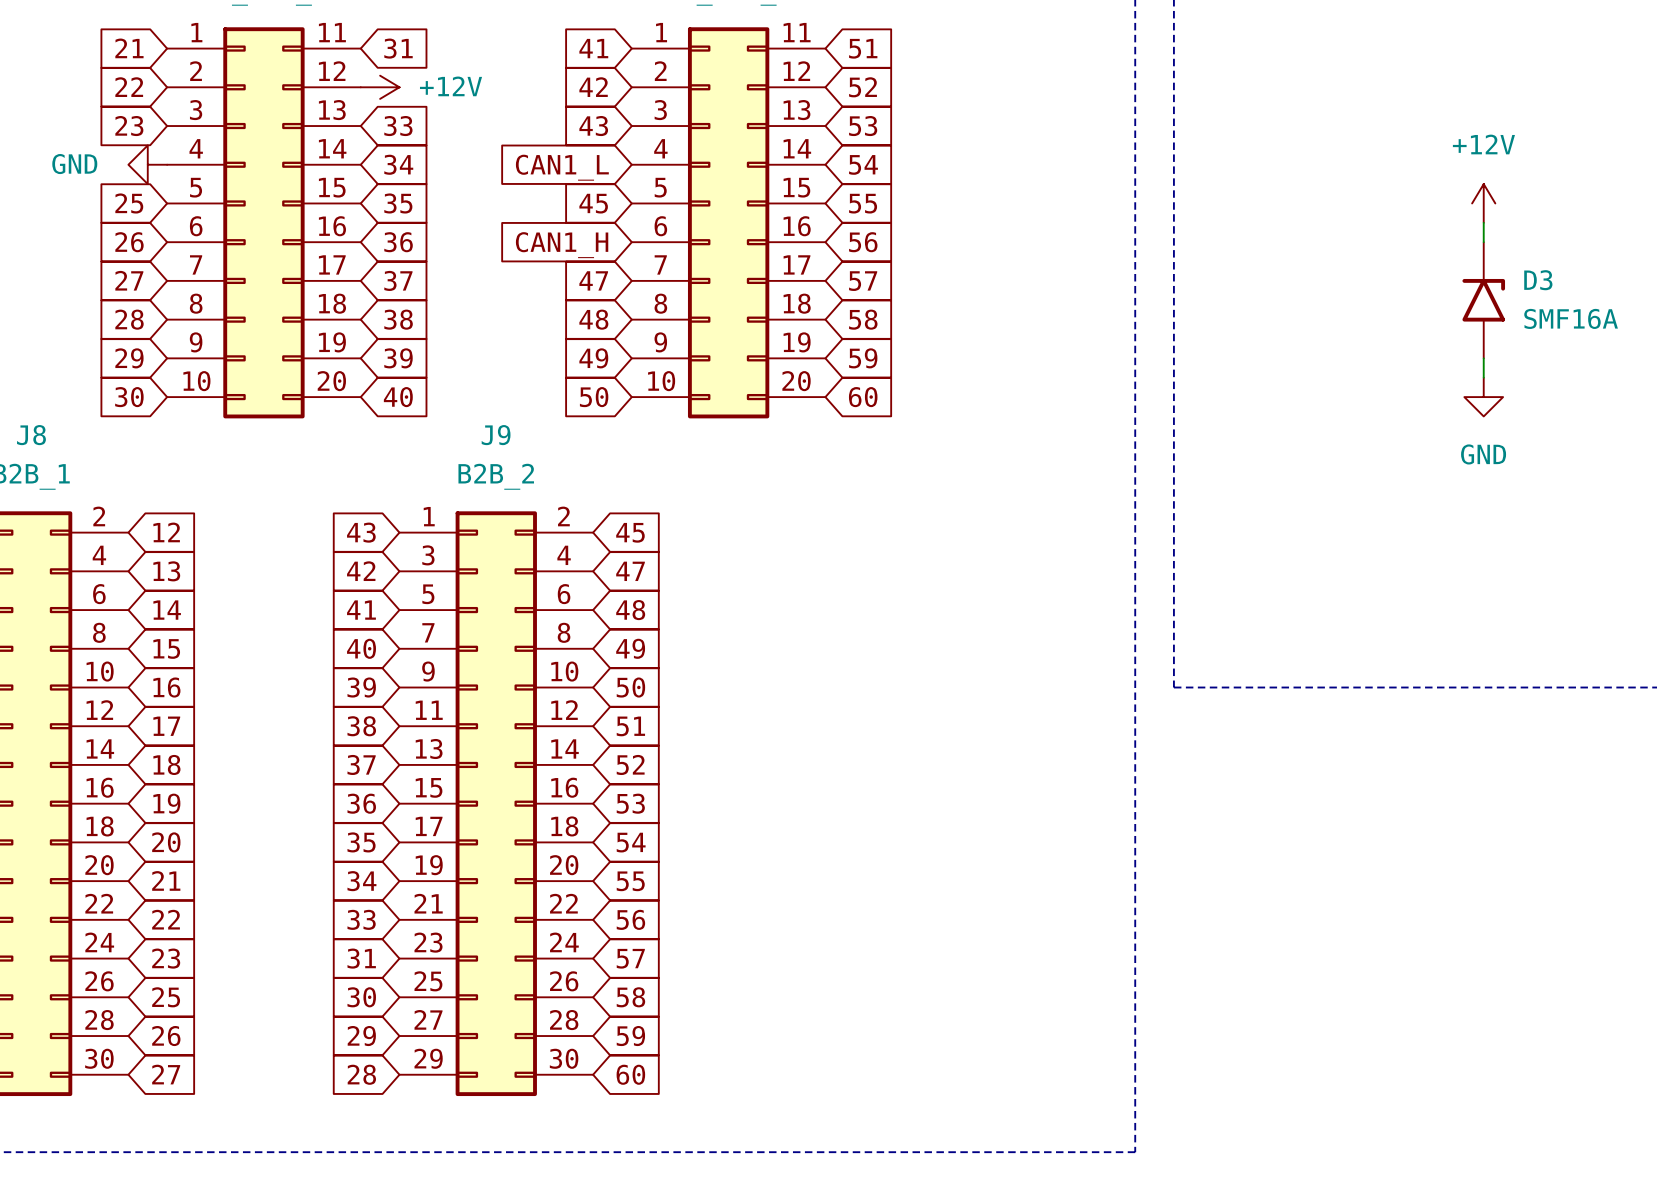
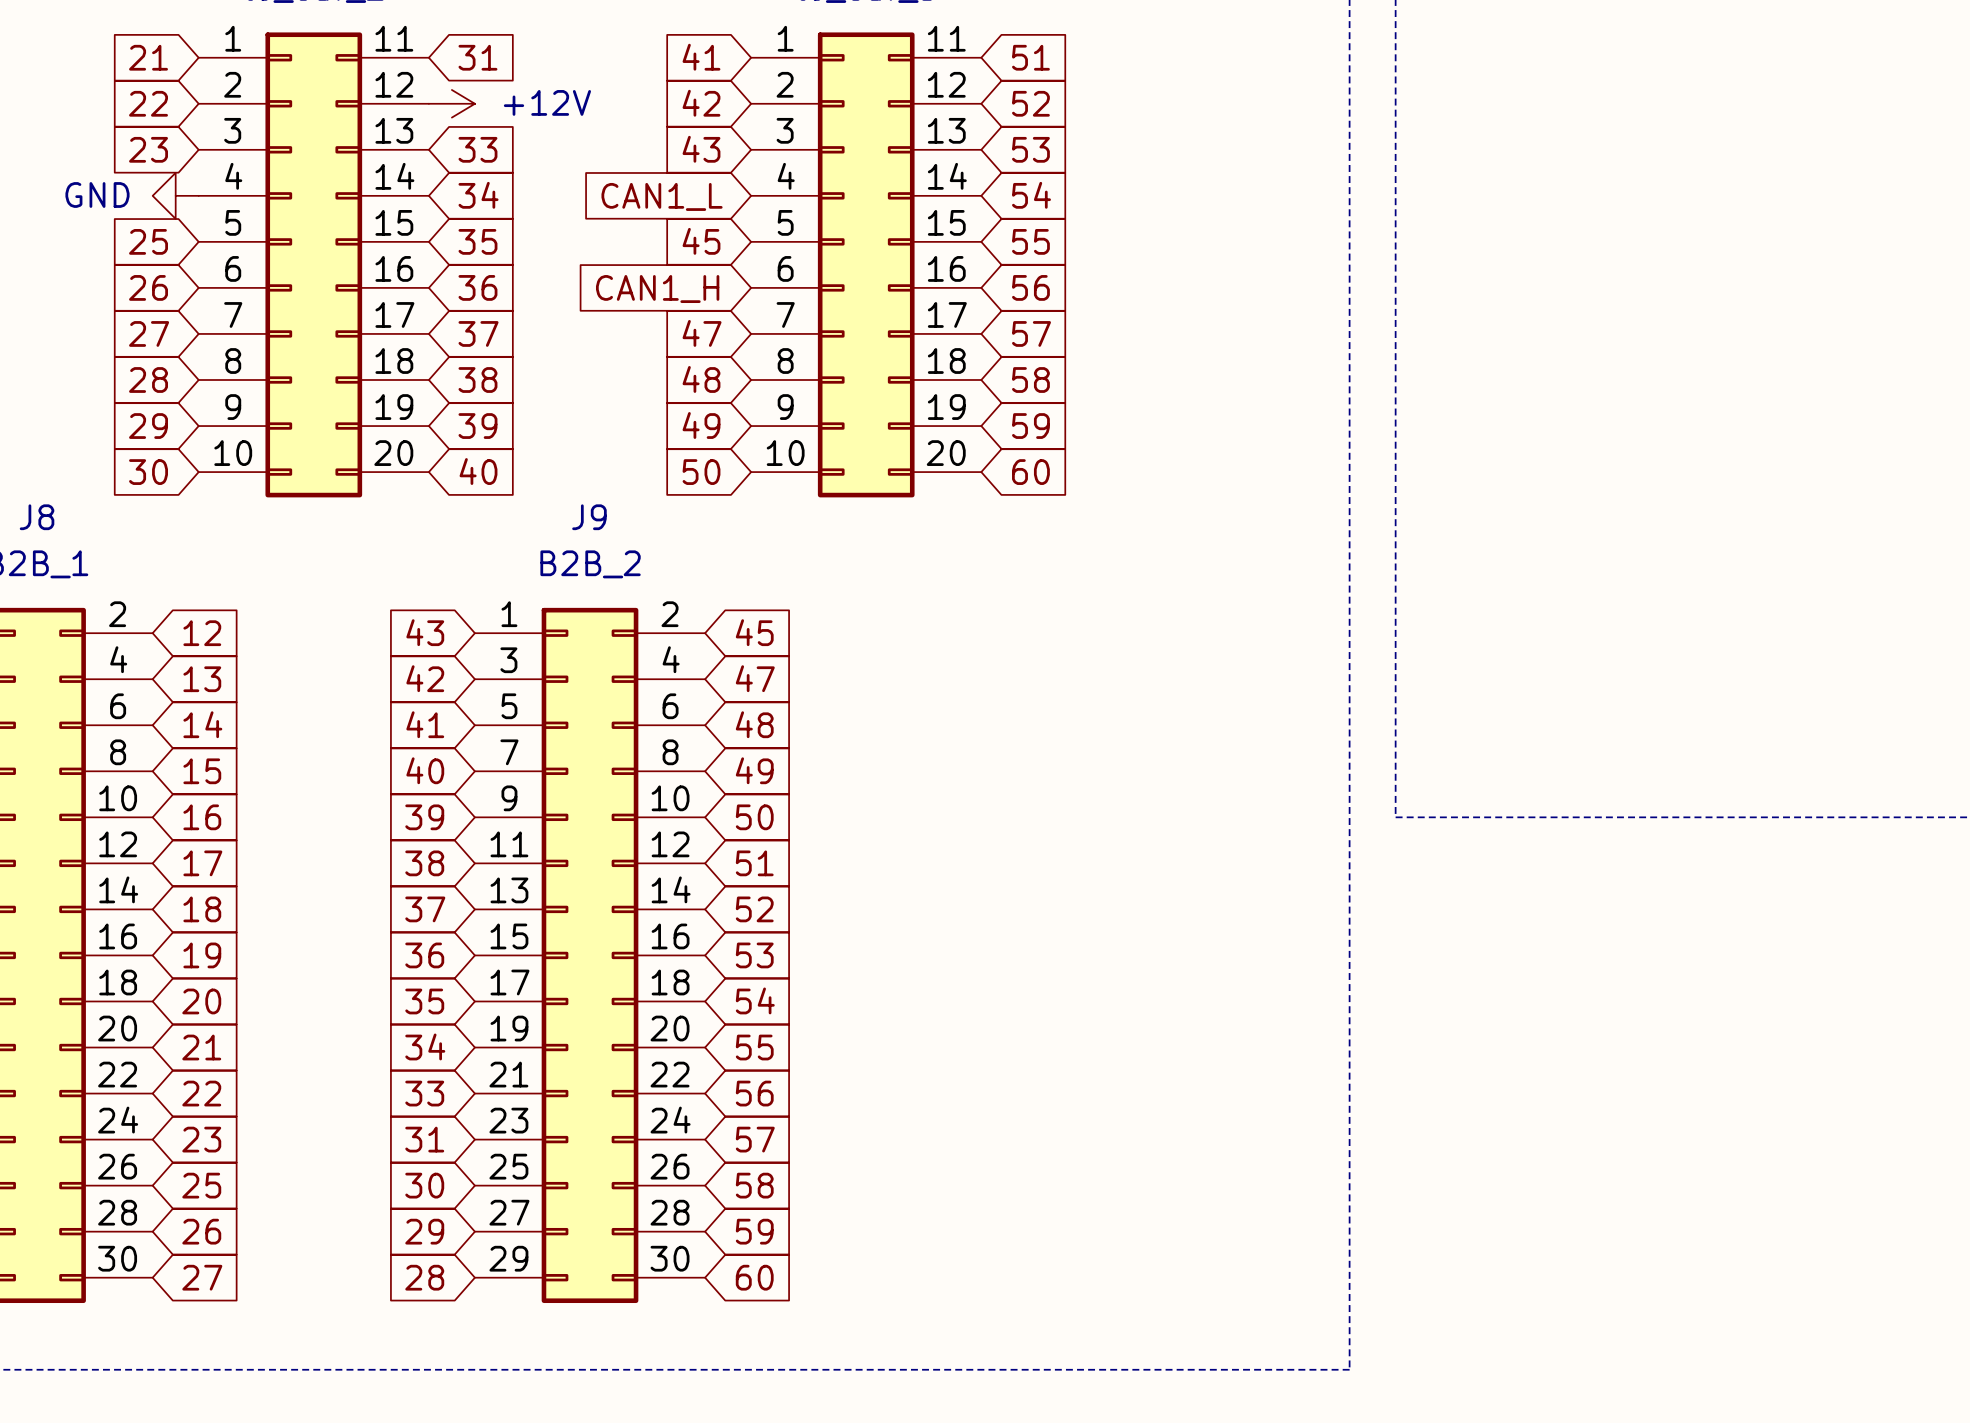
power symbol: +12V (1483, 203) -> none
wire: (1483, 222) (1483, 242) -> none
D3: SMF16A (1483, 300) -> none
wire: (1483, 358) (1483, 377) -> none
power symbol: GND (1483, 397) -> none

